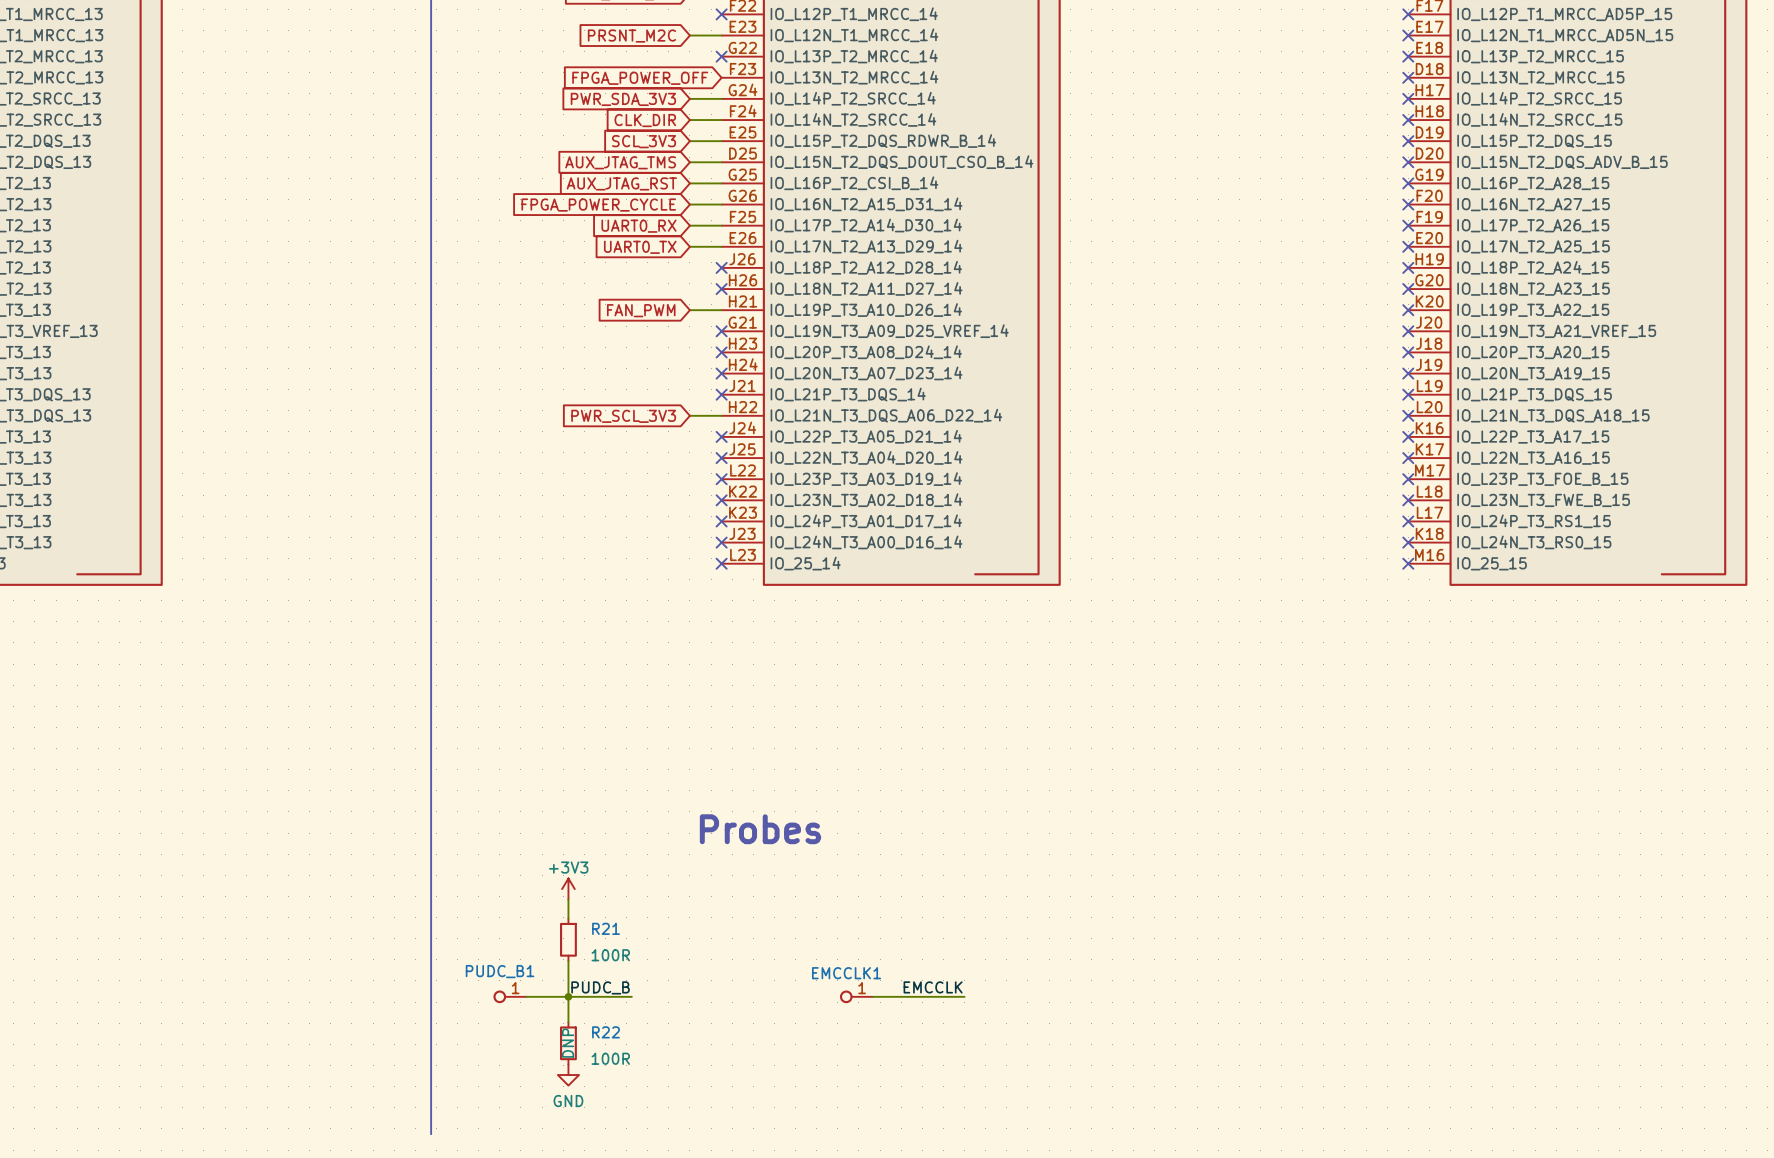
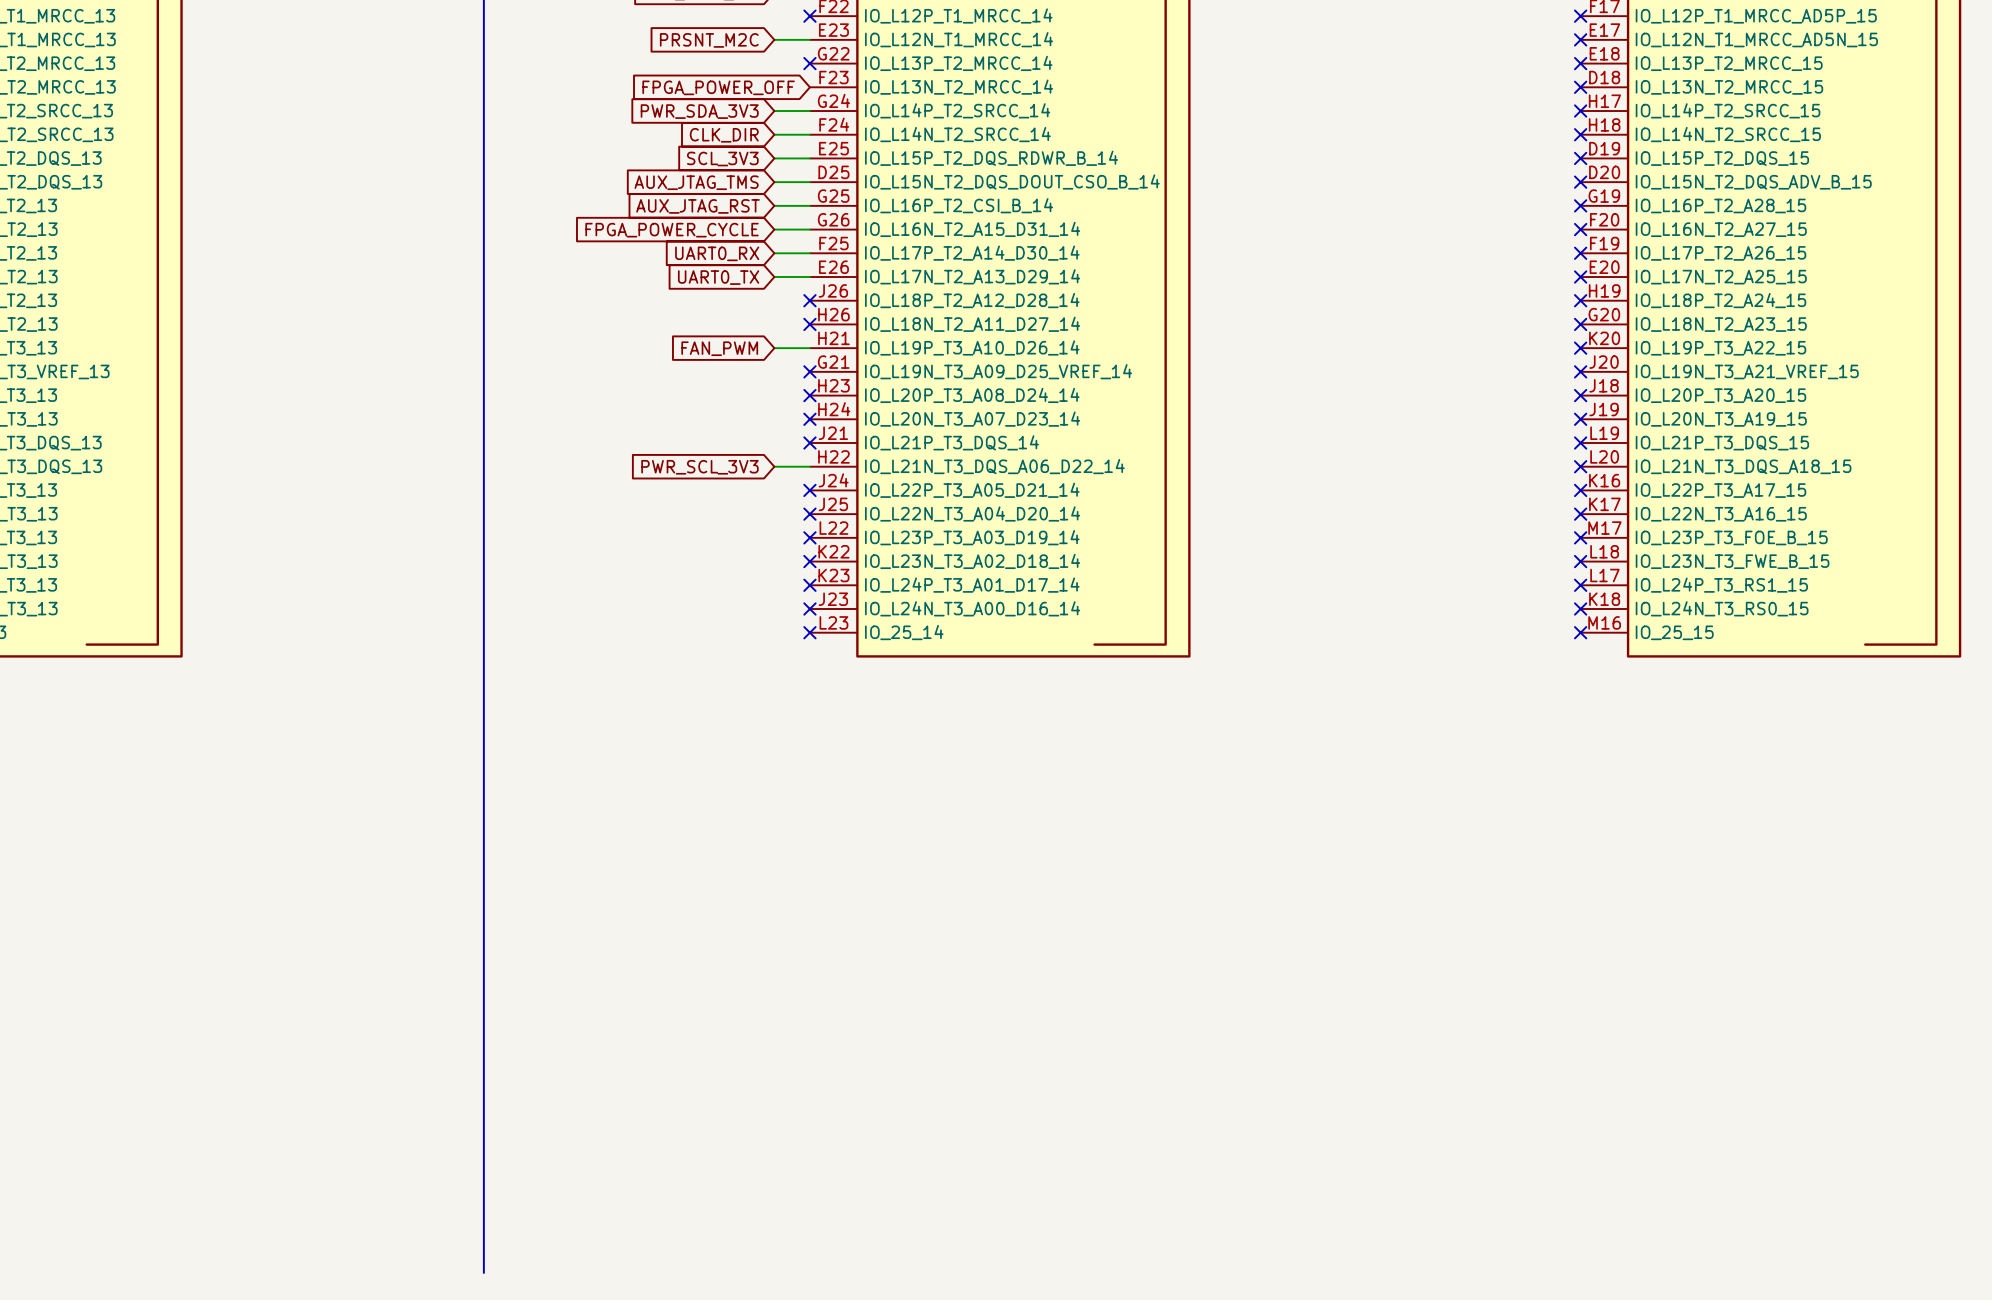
text: Probes (760, 829) -> none
power symbol: +3V3 (568, 889) -> none
wire: (568, 899) (568, 918) -> none
R21: (568, 939) -> none
wire: (568, 960) (568, 1022) -> none
label: PUDC_B (600, 987) -> none
label: EMCCLK (933, 987) -> none
PUDC_B1: (509, 996) -> none
wire: (526, 996) (631, 996) -> none
junction: (568, 996) -> none
EMCCLK1: (856, 996) -> none
wire: (872, 996) (964, 996) -> none
R22: (568, 1043) -> none
power symbol: GND (568, 1075) -> none

